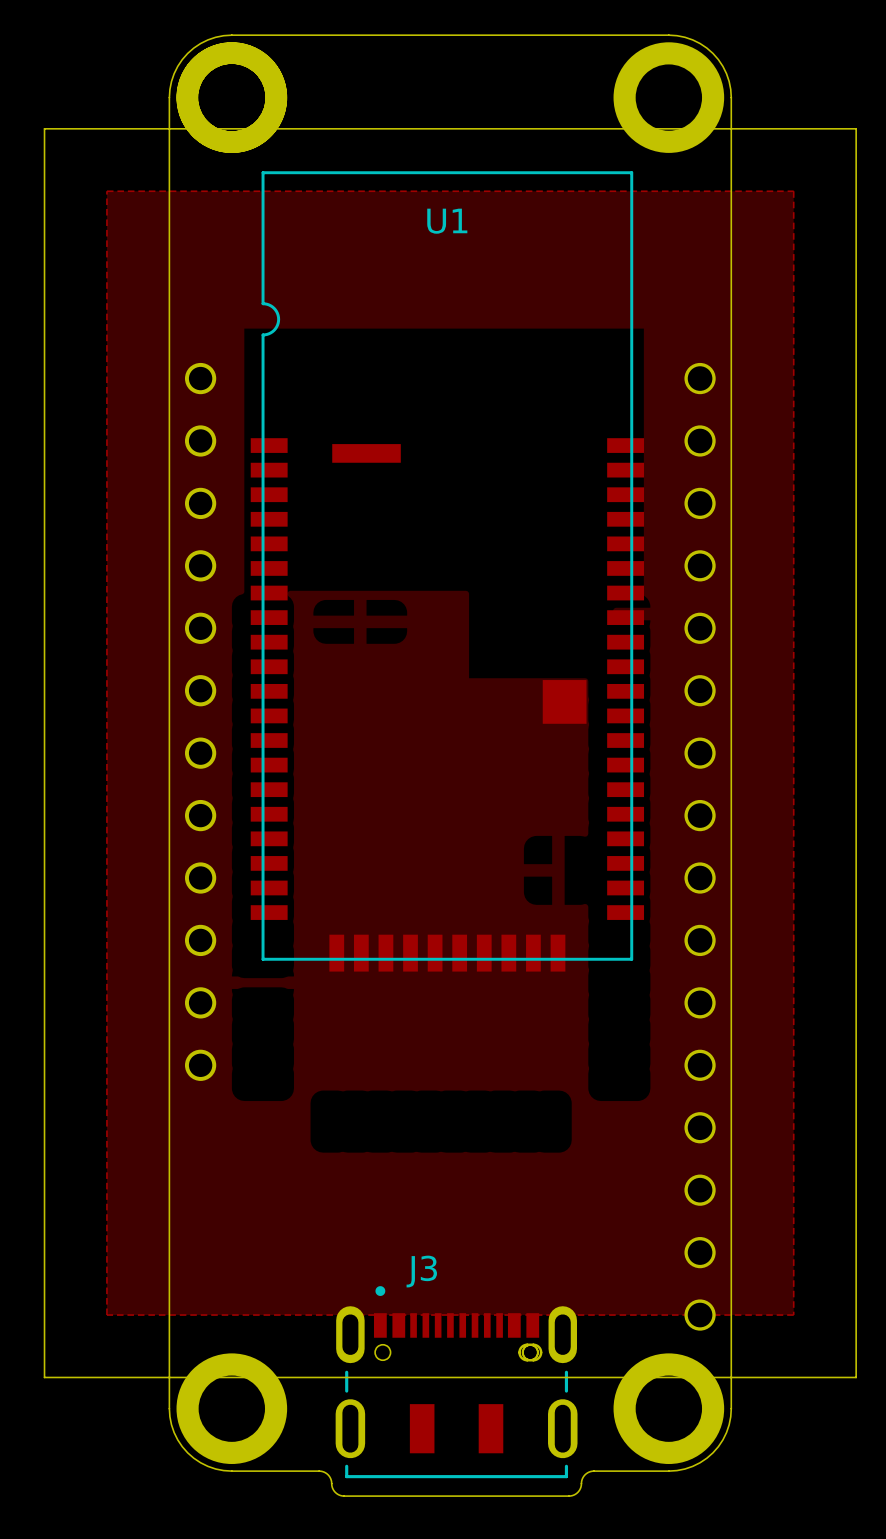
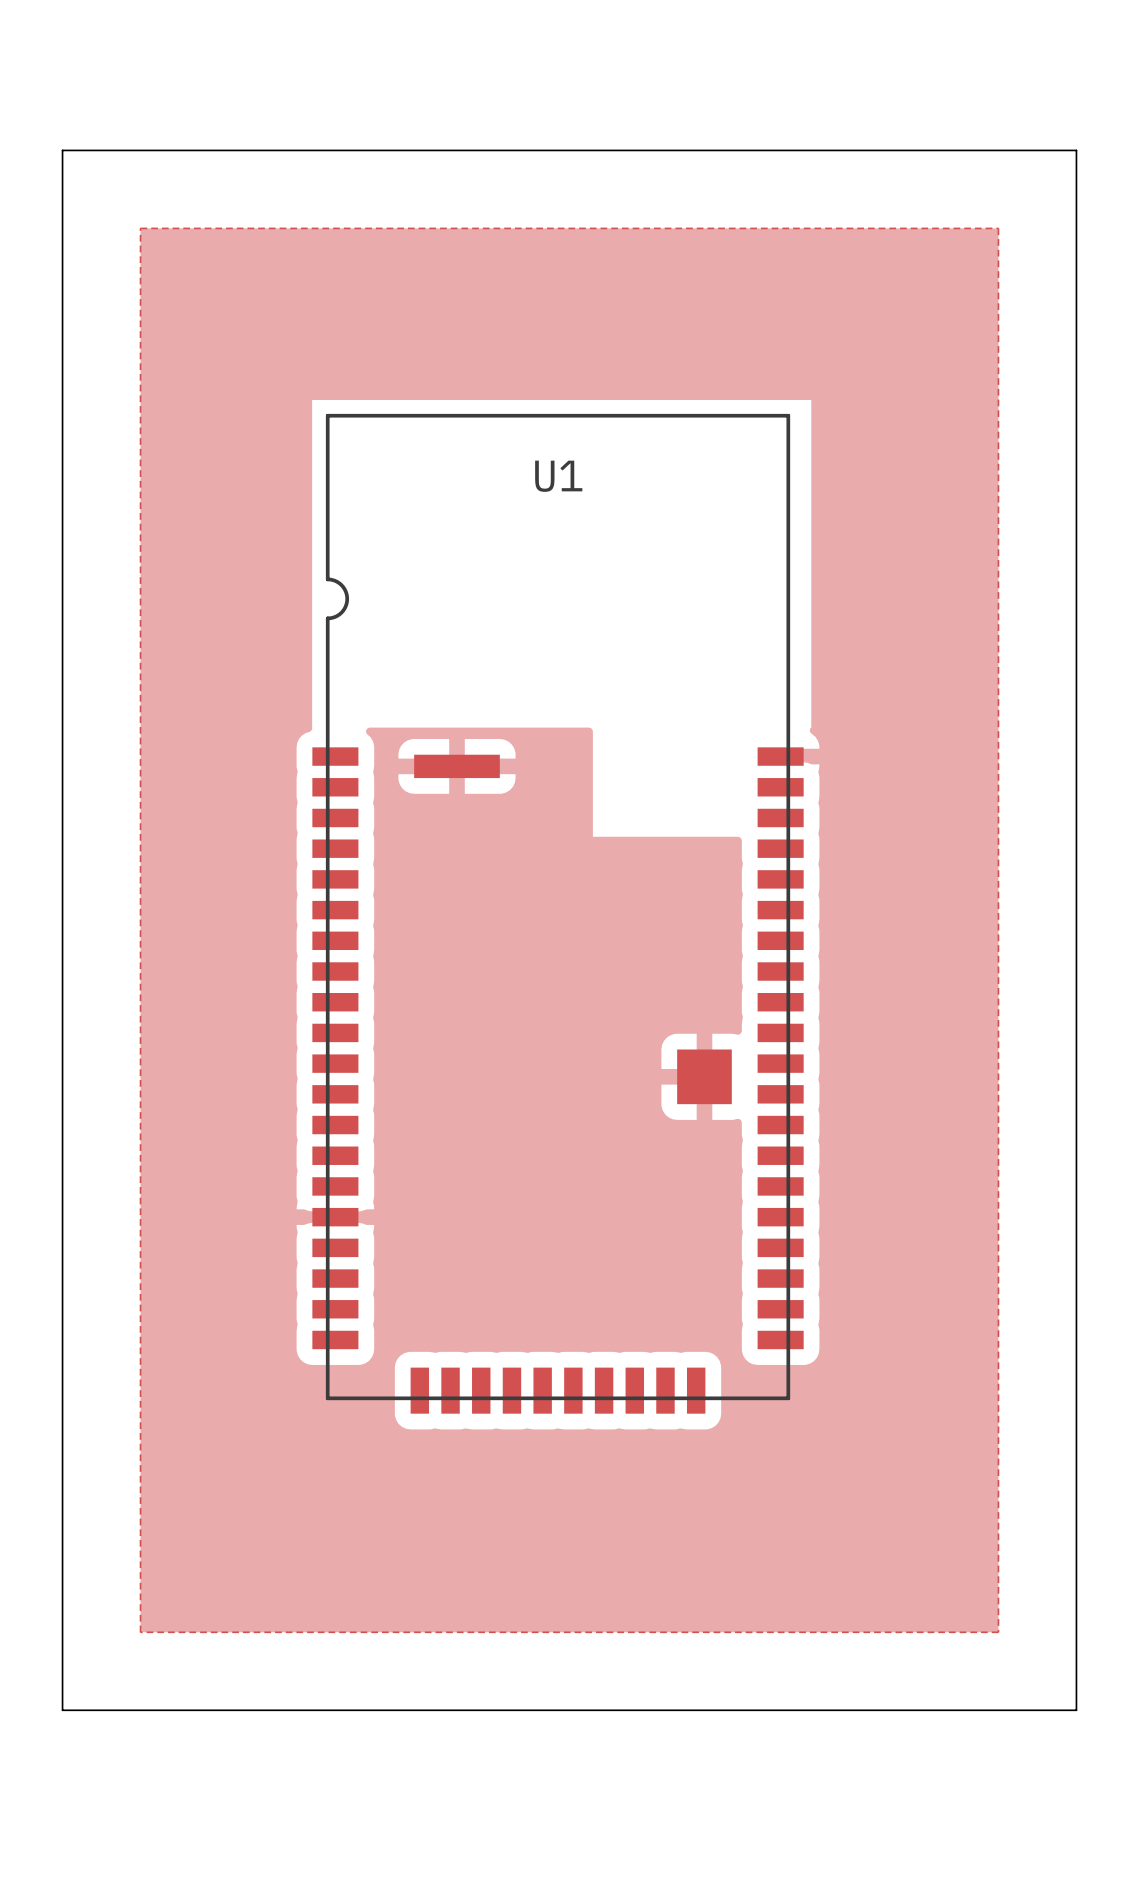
board edge: (231, 35) (677, 35) (692, 39) (712, 53) (722, 66) (729, 81) (731, 97) (731, 1408) (729, 1424) (718, 1446) (700, 1462) (685, 1468) (668, 1471) (590, 1471) (583, 1477) (578, 1491) (570, 1495) (342, 1495) (334, 1491) (330, 1477) (322, 1471) (231, 1471) (207, 1466) (193, 1458) (182, 1446) (171, 1424) (169, 1408) (169, 97) (174, 73) (187, 53) (207, 39) (231, 35) -> none
part: (231, 97) -> none
part: (668, 97) -> none
U1 position: (447, 571) -> (558, 913)
part: (200, 721) -> none
part: (700, 846) -> none
J3: (456, 1382) -> none
part: (231, 1408) -> none
part: (668, 1408) -> none

